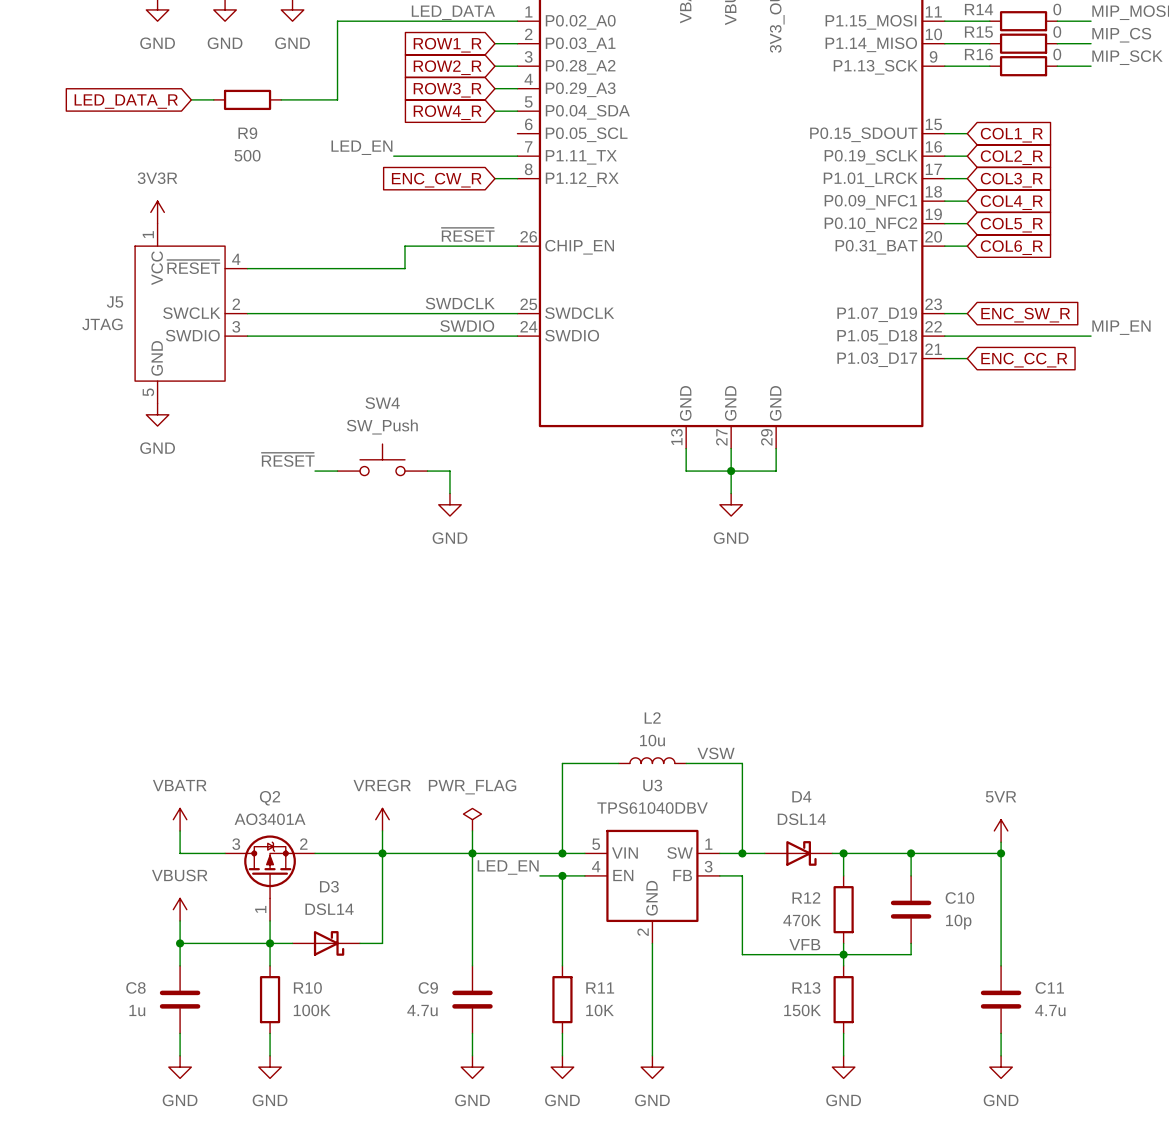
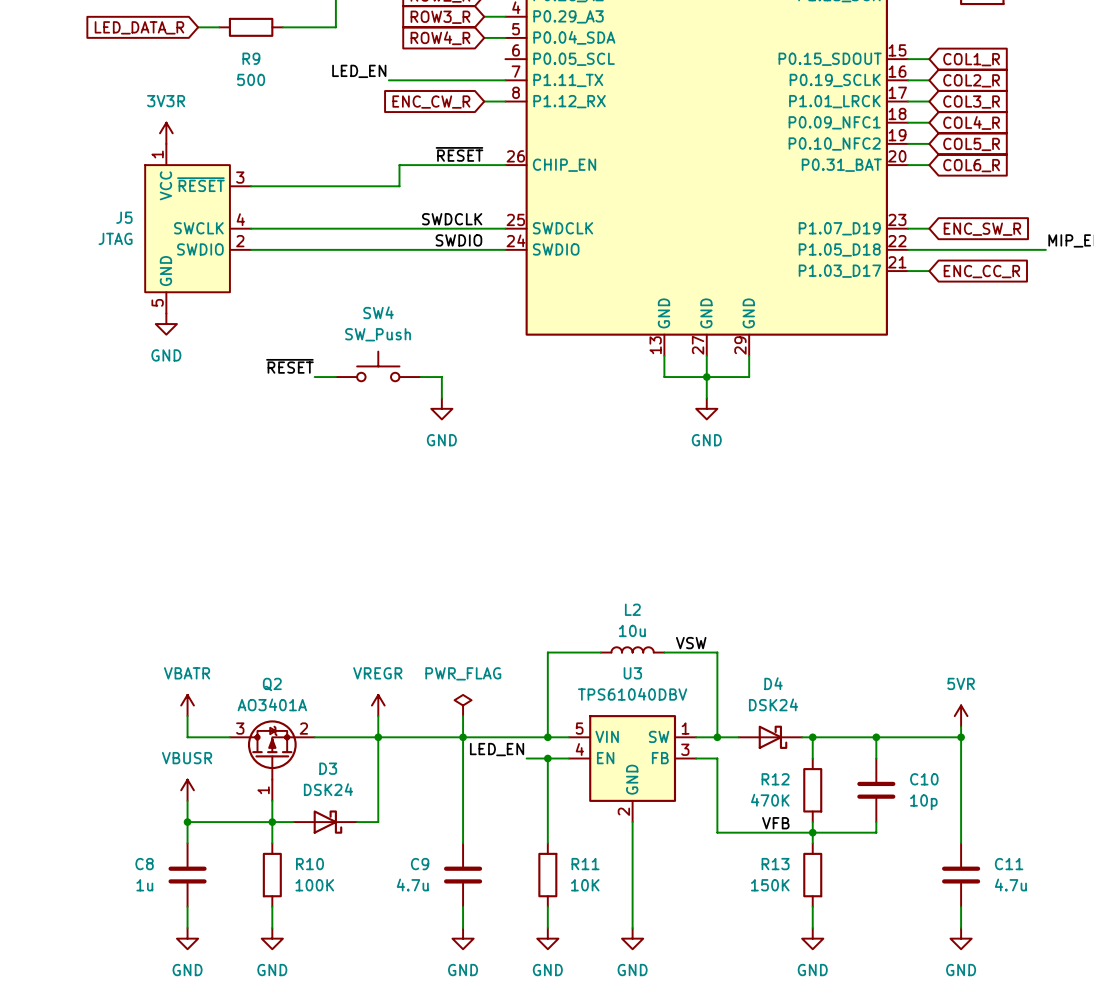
J5 pin number: 4 (236, 259) -> 3 (240, 177)
J5 pin number: 2 (236, 304) -> 4 (240, 219)
J5 pin number: 3 (236, 326) -> 2 (240, 241)
D4 value: DSL14 (801, 819) -> DSK24 (773, 704)
D3 value: DSL14 (329, 909) -> DSK24 (328, 789)

